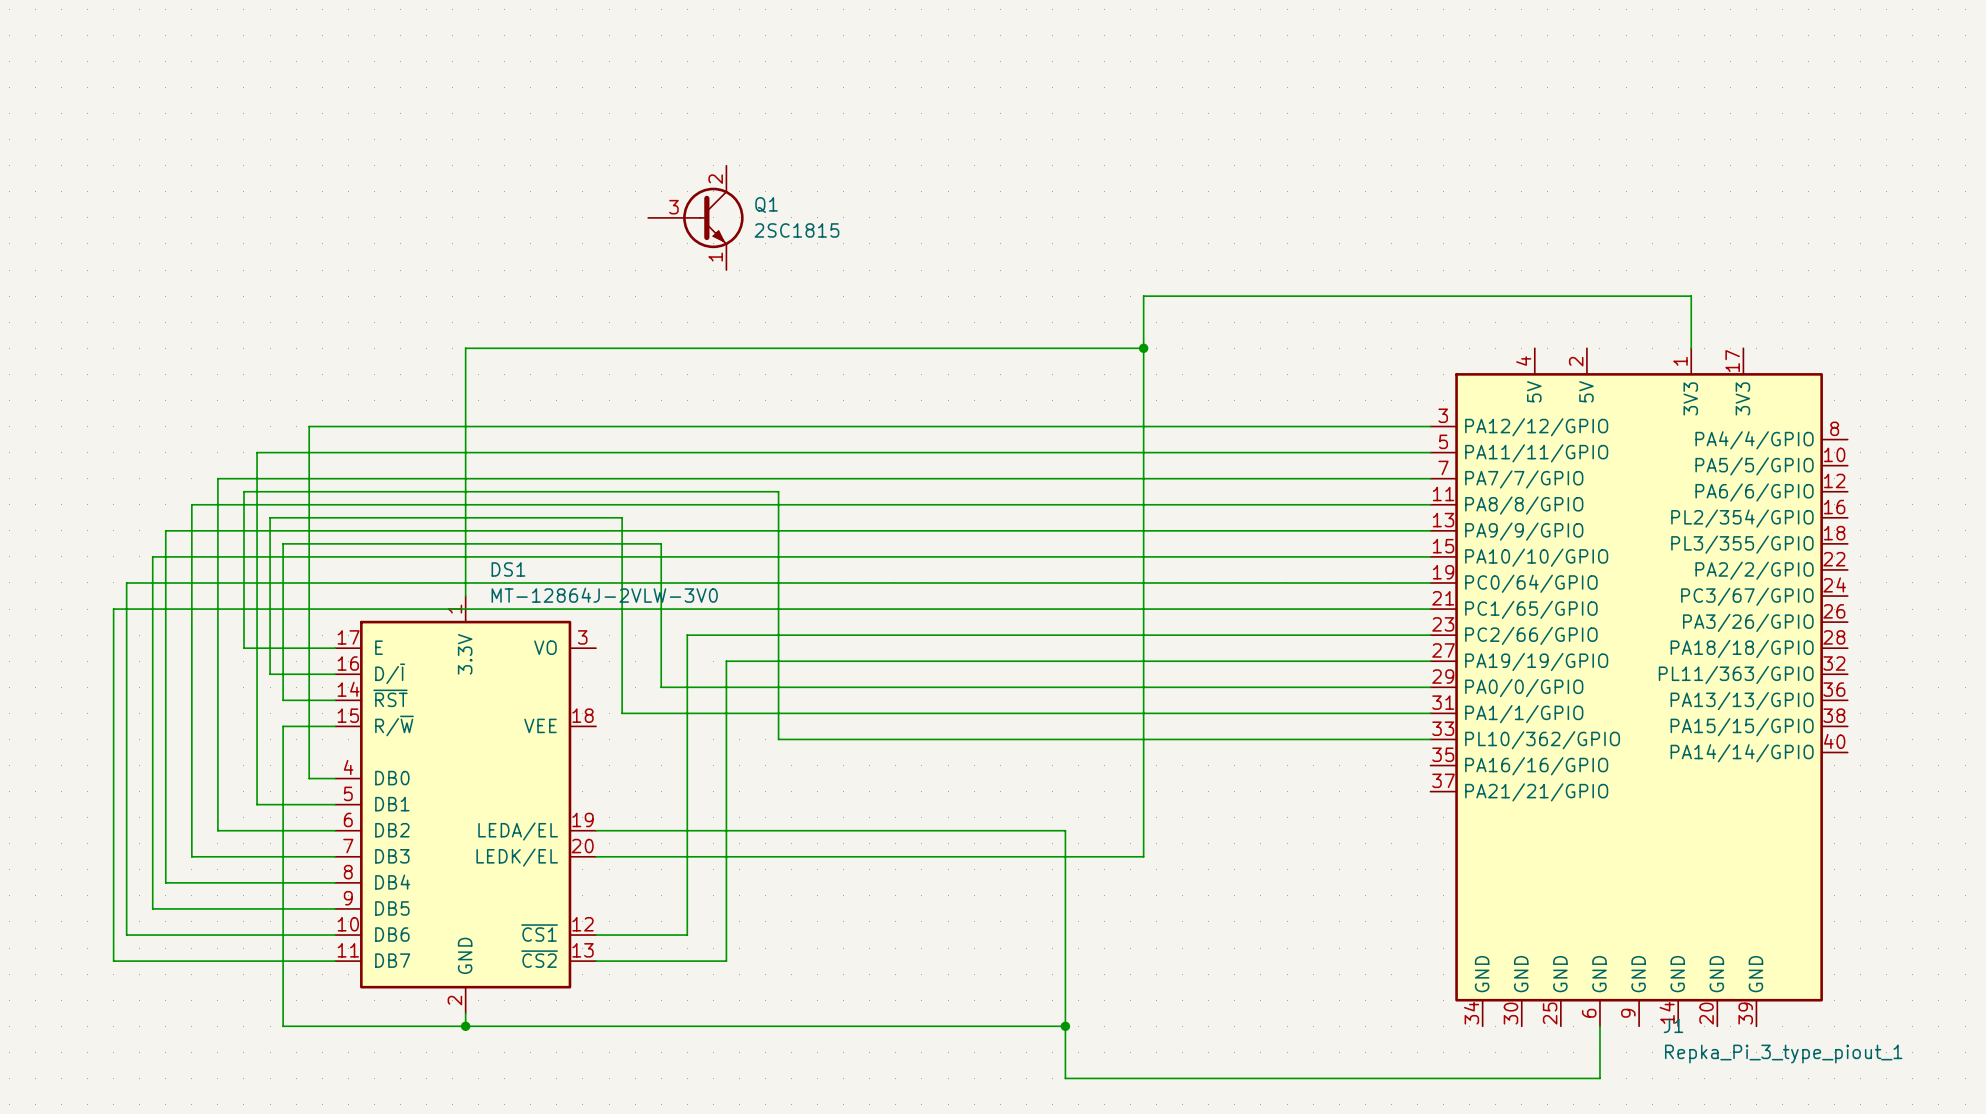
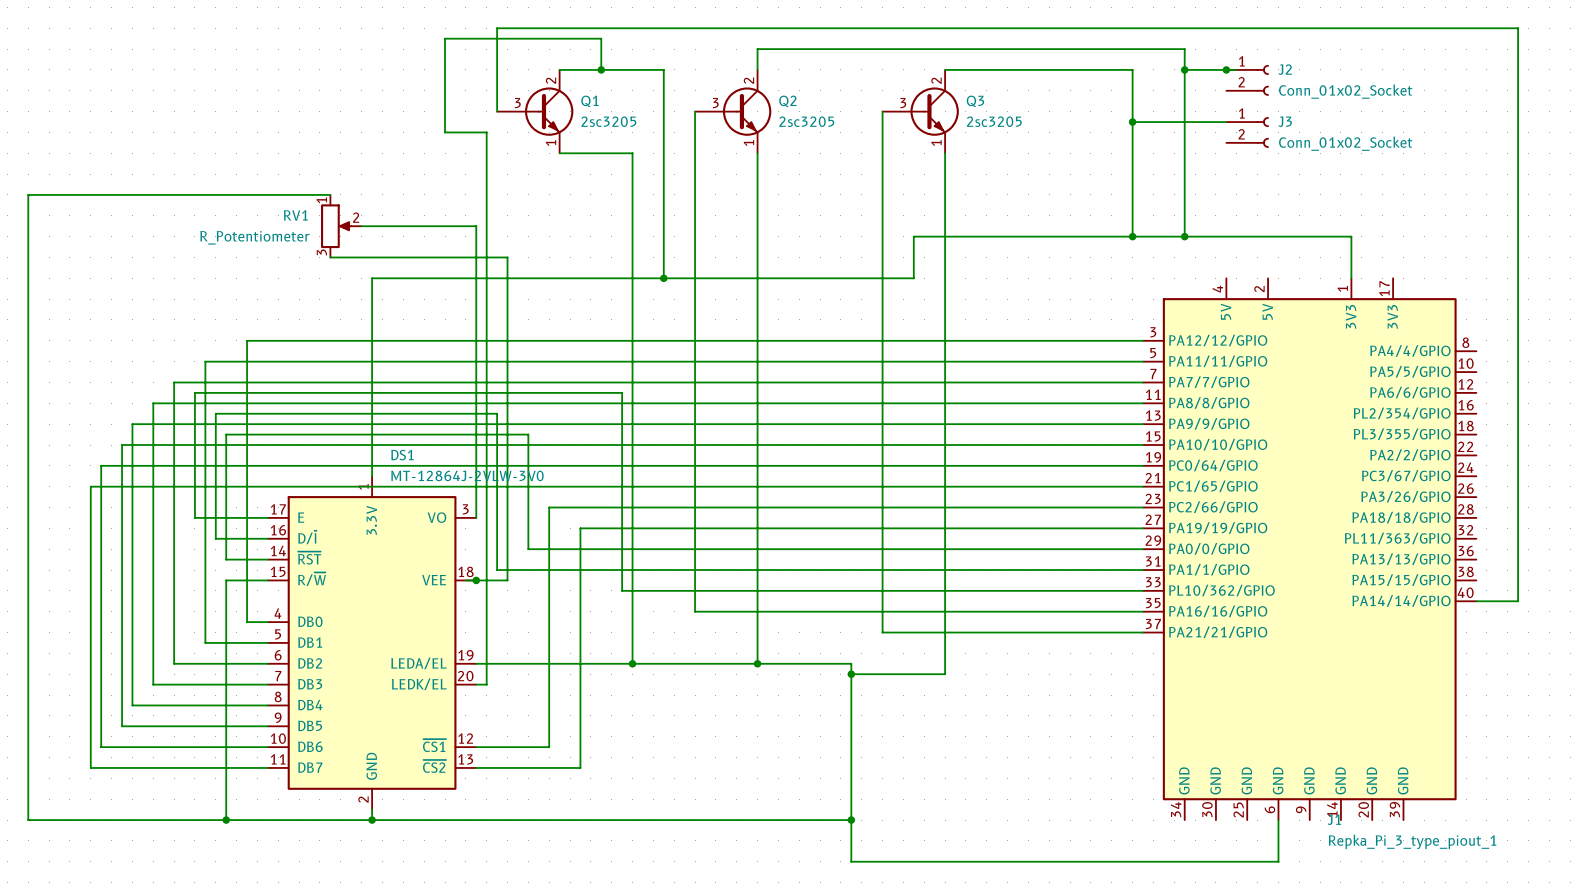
wire: none -> (559, 69) (663, 69) (663, 278)
junction: none -> (601, 69)
wire: none -> (757, 69) (757, 49) (1184, 49) (1184, 236)
wire: none -> (945, 69) (1132, 69) (1132, 236)
wire: none -> (1184, 69) (1236, 69)
junction: none -> (1184, 69)
junction: none -> (1226, 69)
J2: none -> Conn_01x02_Socket (1247, 80)
wire: none -> (497, 111) (497, 28) (1518, 28) (1518, 601) (1476, 601)
wire: none -> (695, 111) (695, 611) (1143, 611)
Q2: none -> 2sc3205 (733, 111)
wire: none -> (882, 111) (882, 632) (1143, 632)
Q3: none -> 2sc3205 (920, 111)
wire: none -> (1132, 122) (1226, 122)
junction: none -> (1132, 122)
J3: none -> Conn_01x02_Socket (1247, 132)
wire: none -> (559, 153) (632, 153) (632, 663)
wire: none -> (757, 153) (757, 663)
wire: none -> (945, 153) (945, 674) (851, 674)
Q1 position: (695, 217) -> (535, 111)
Q1 value: 2SC1815 (796, 230) -> 2sc3205 (608, 121)
wire: none -> (330, 194) (28, 194) (28, 820) (226, 820)
RV1: none -> R_Potentiometer (341, 226)
wire: none -> (361, 226) (476, 226) (476, 517)
junction: none -> (1132, 236)
junction: none -> (1184, 236)
wire: none -> (330, 257) (507, 257) (507, 580) (465, 580)
junction: none -> (663, 278)
wire: (1143, 348) (1143, 856) (609, 856) -> (601, 69) (601, 38) (445, 38) (445, 132) (486, 132) (486, 684)
junction: (1143, 348) -> none
junction: none -> (476, 580)
junction: none -> (632, 663)
junction: none -> (757, 663)
junction: none -> (851, 674)
junction: none -> (226, 820)

